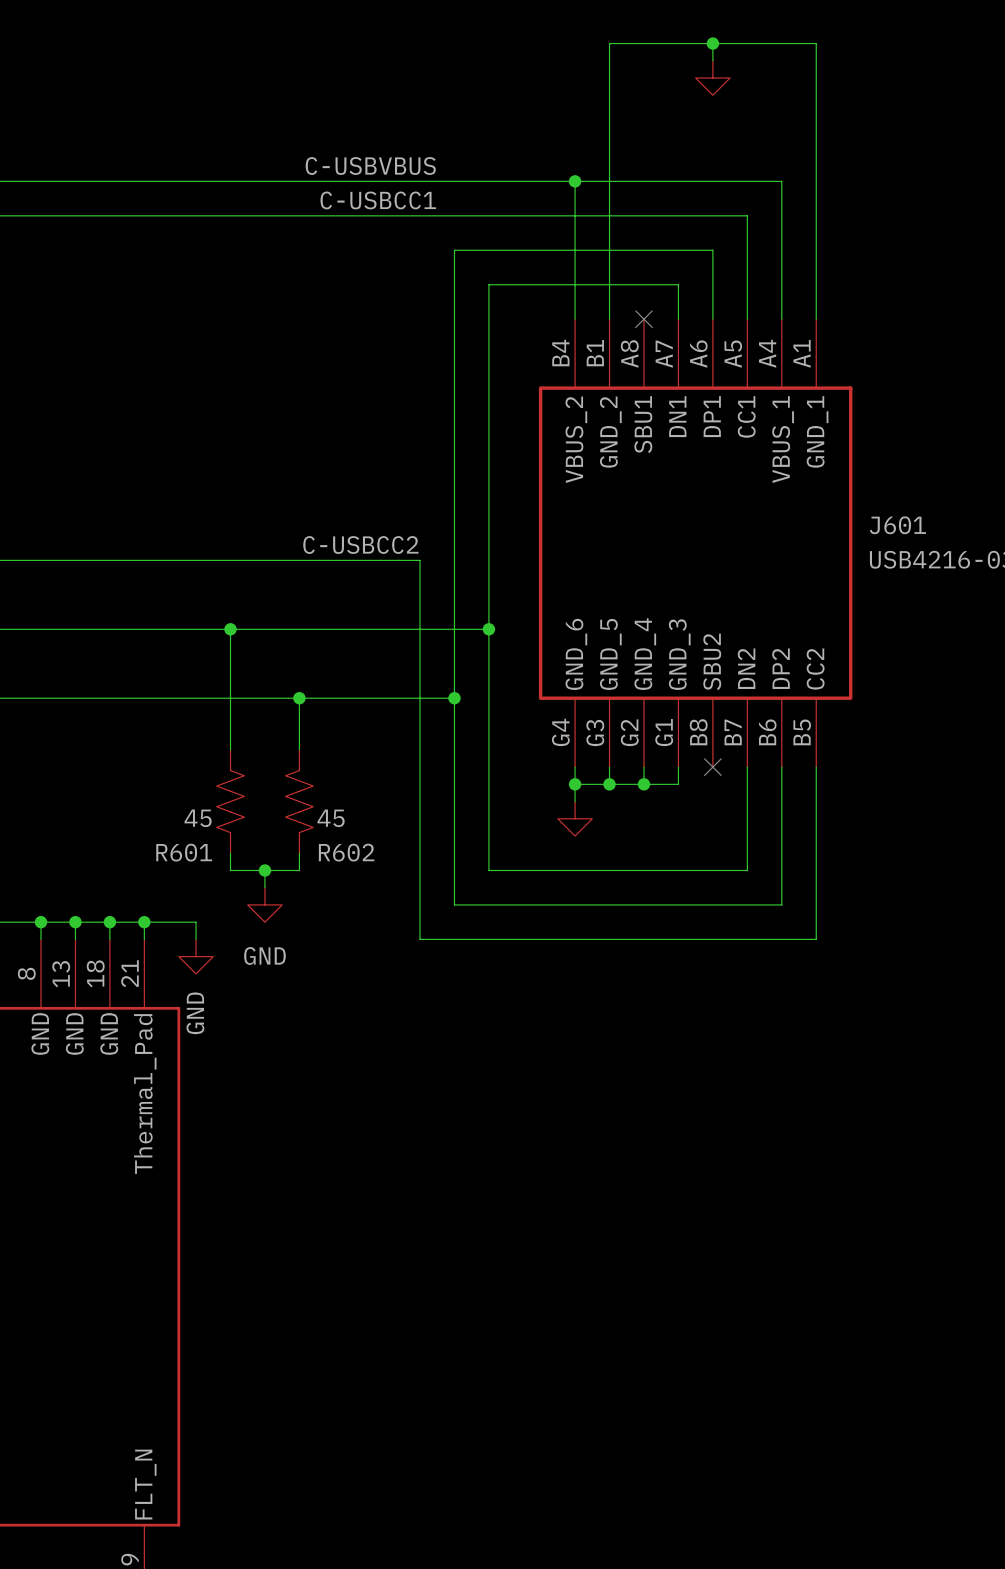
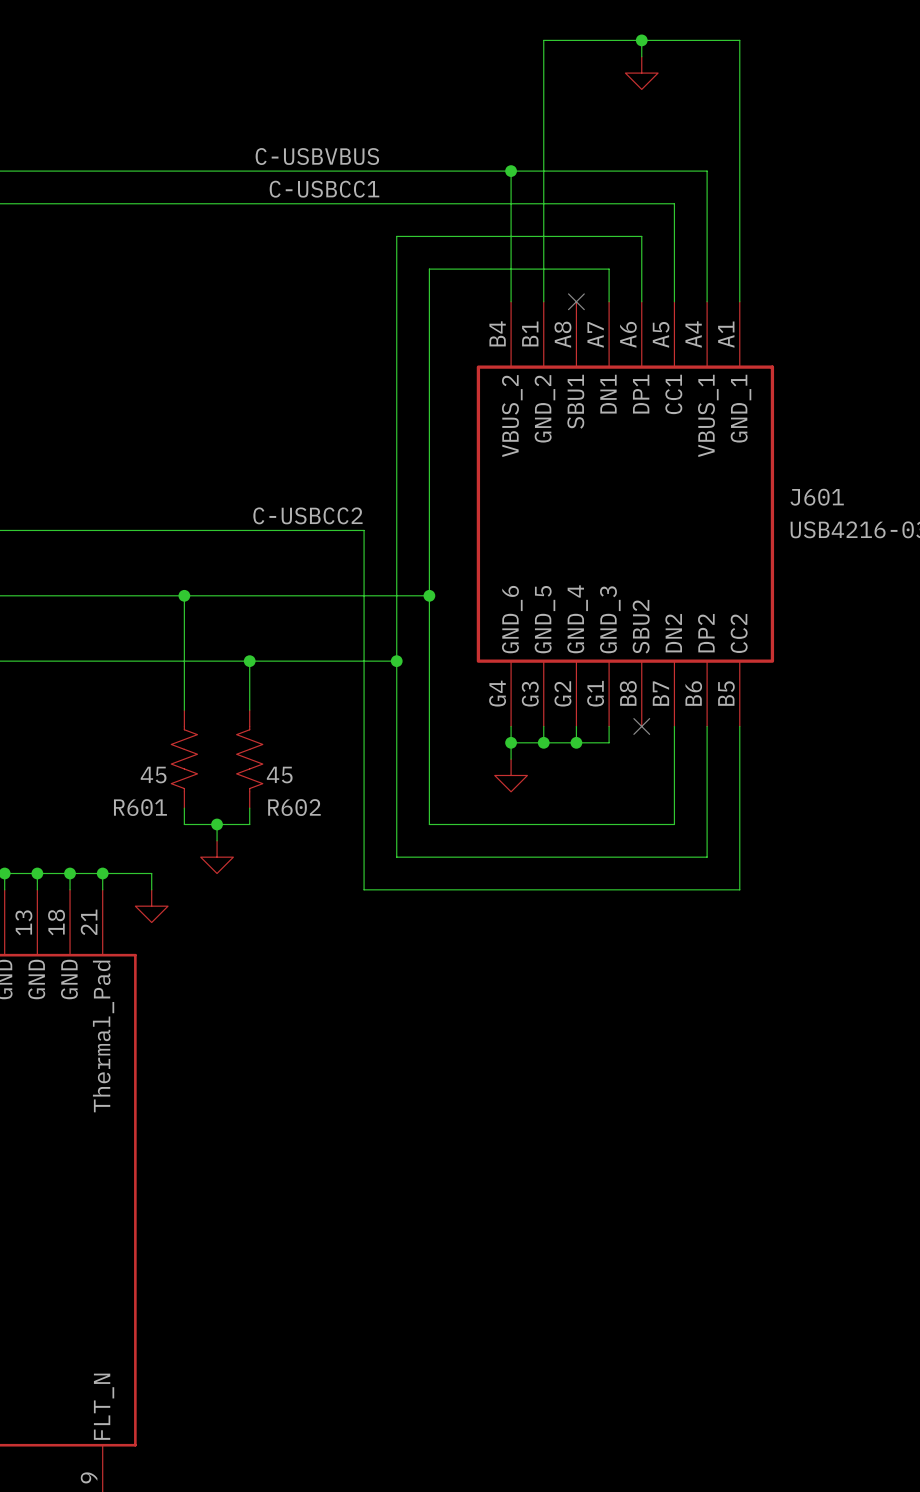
power symbol text: GND (264, 955) -> none
power symbol text: GND (195, 1013) -> none

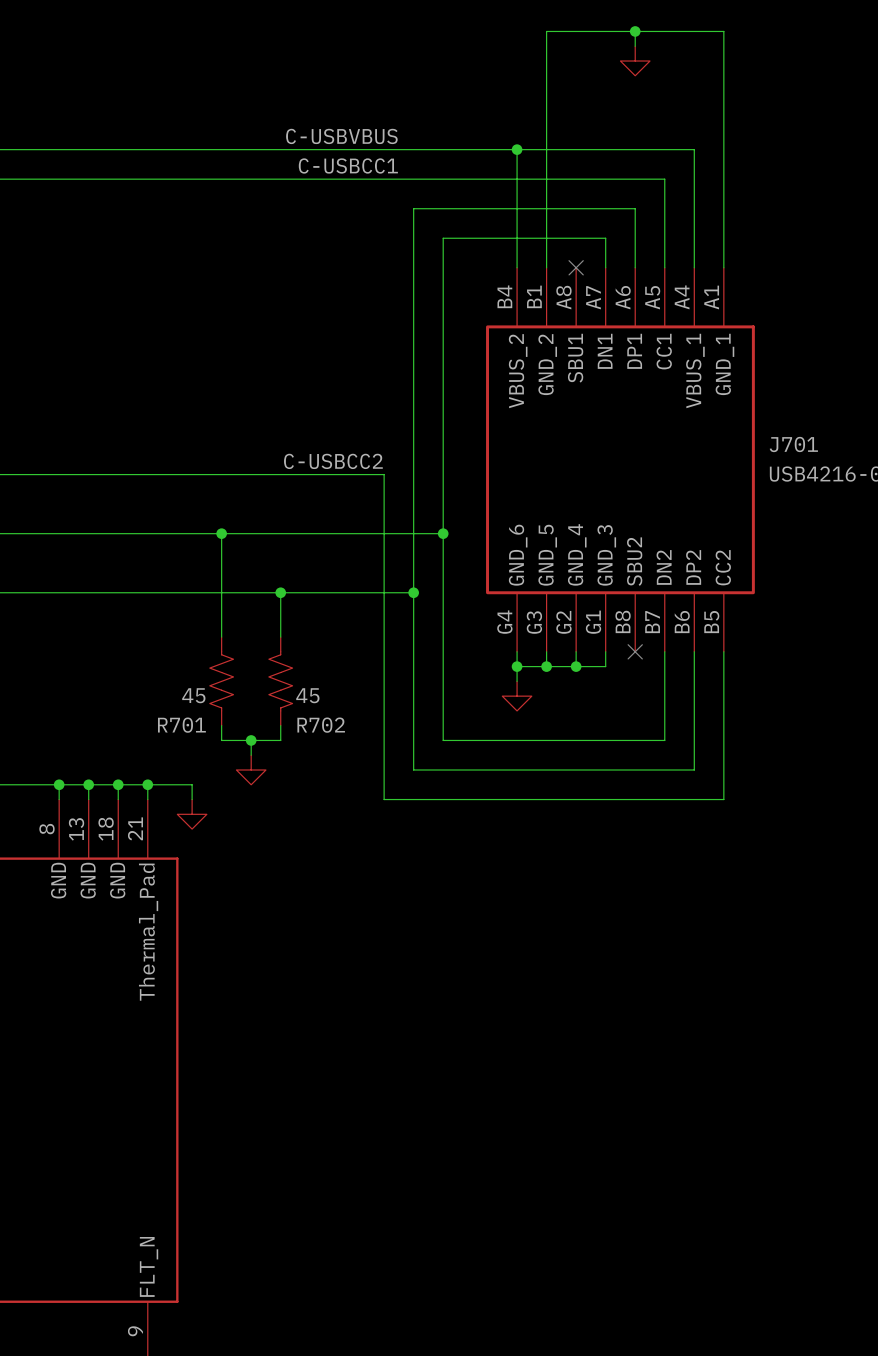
J601 name: J601 (817, 497) -> J701 (793, 444)
R601 name: R601 (140, 807) -> R701 (181, 725)
R602 name: R602 (294, 807) -> R702 (321, 725)

